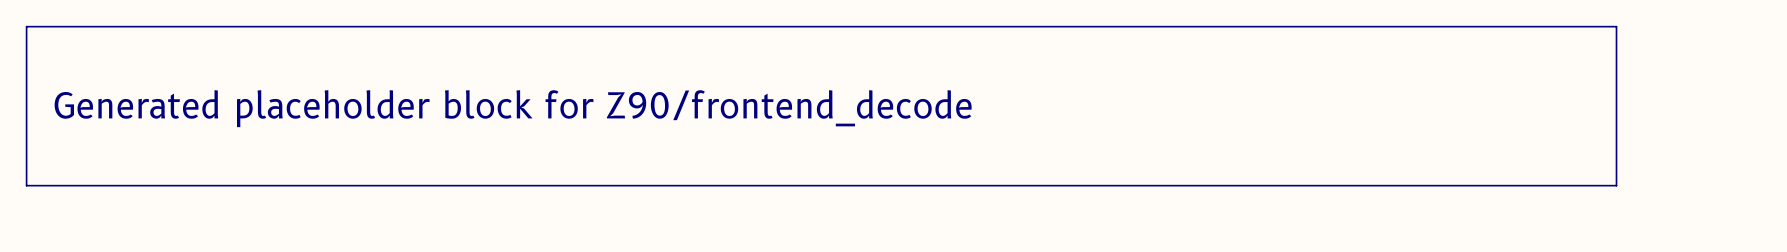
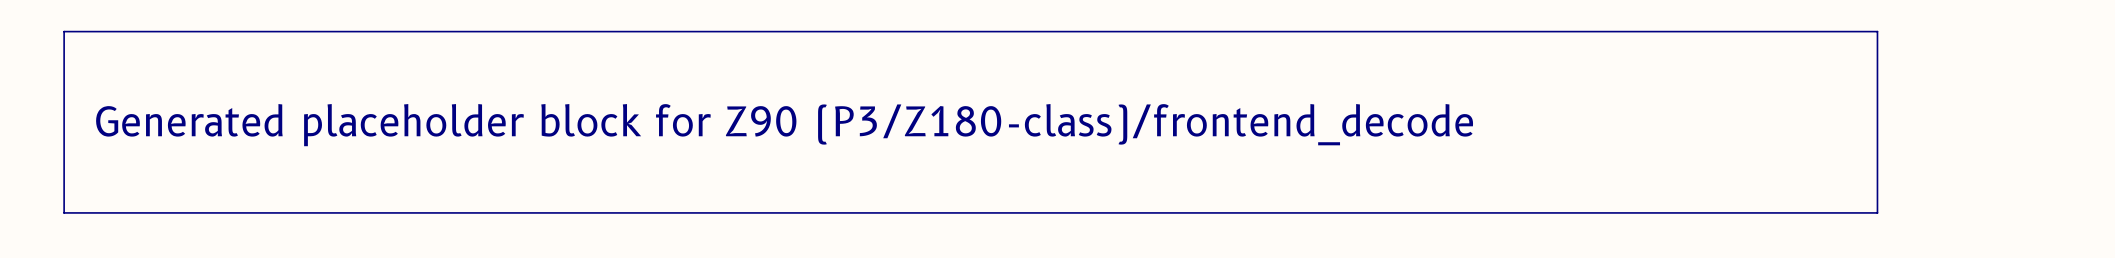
text: Generated placeholder block for Z90/frontend_decode (513, 108) -> Generated placeholder block for Z90 (P3/Z180-class)/frontend_decode (784, 125)

